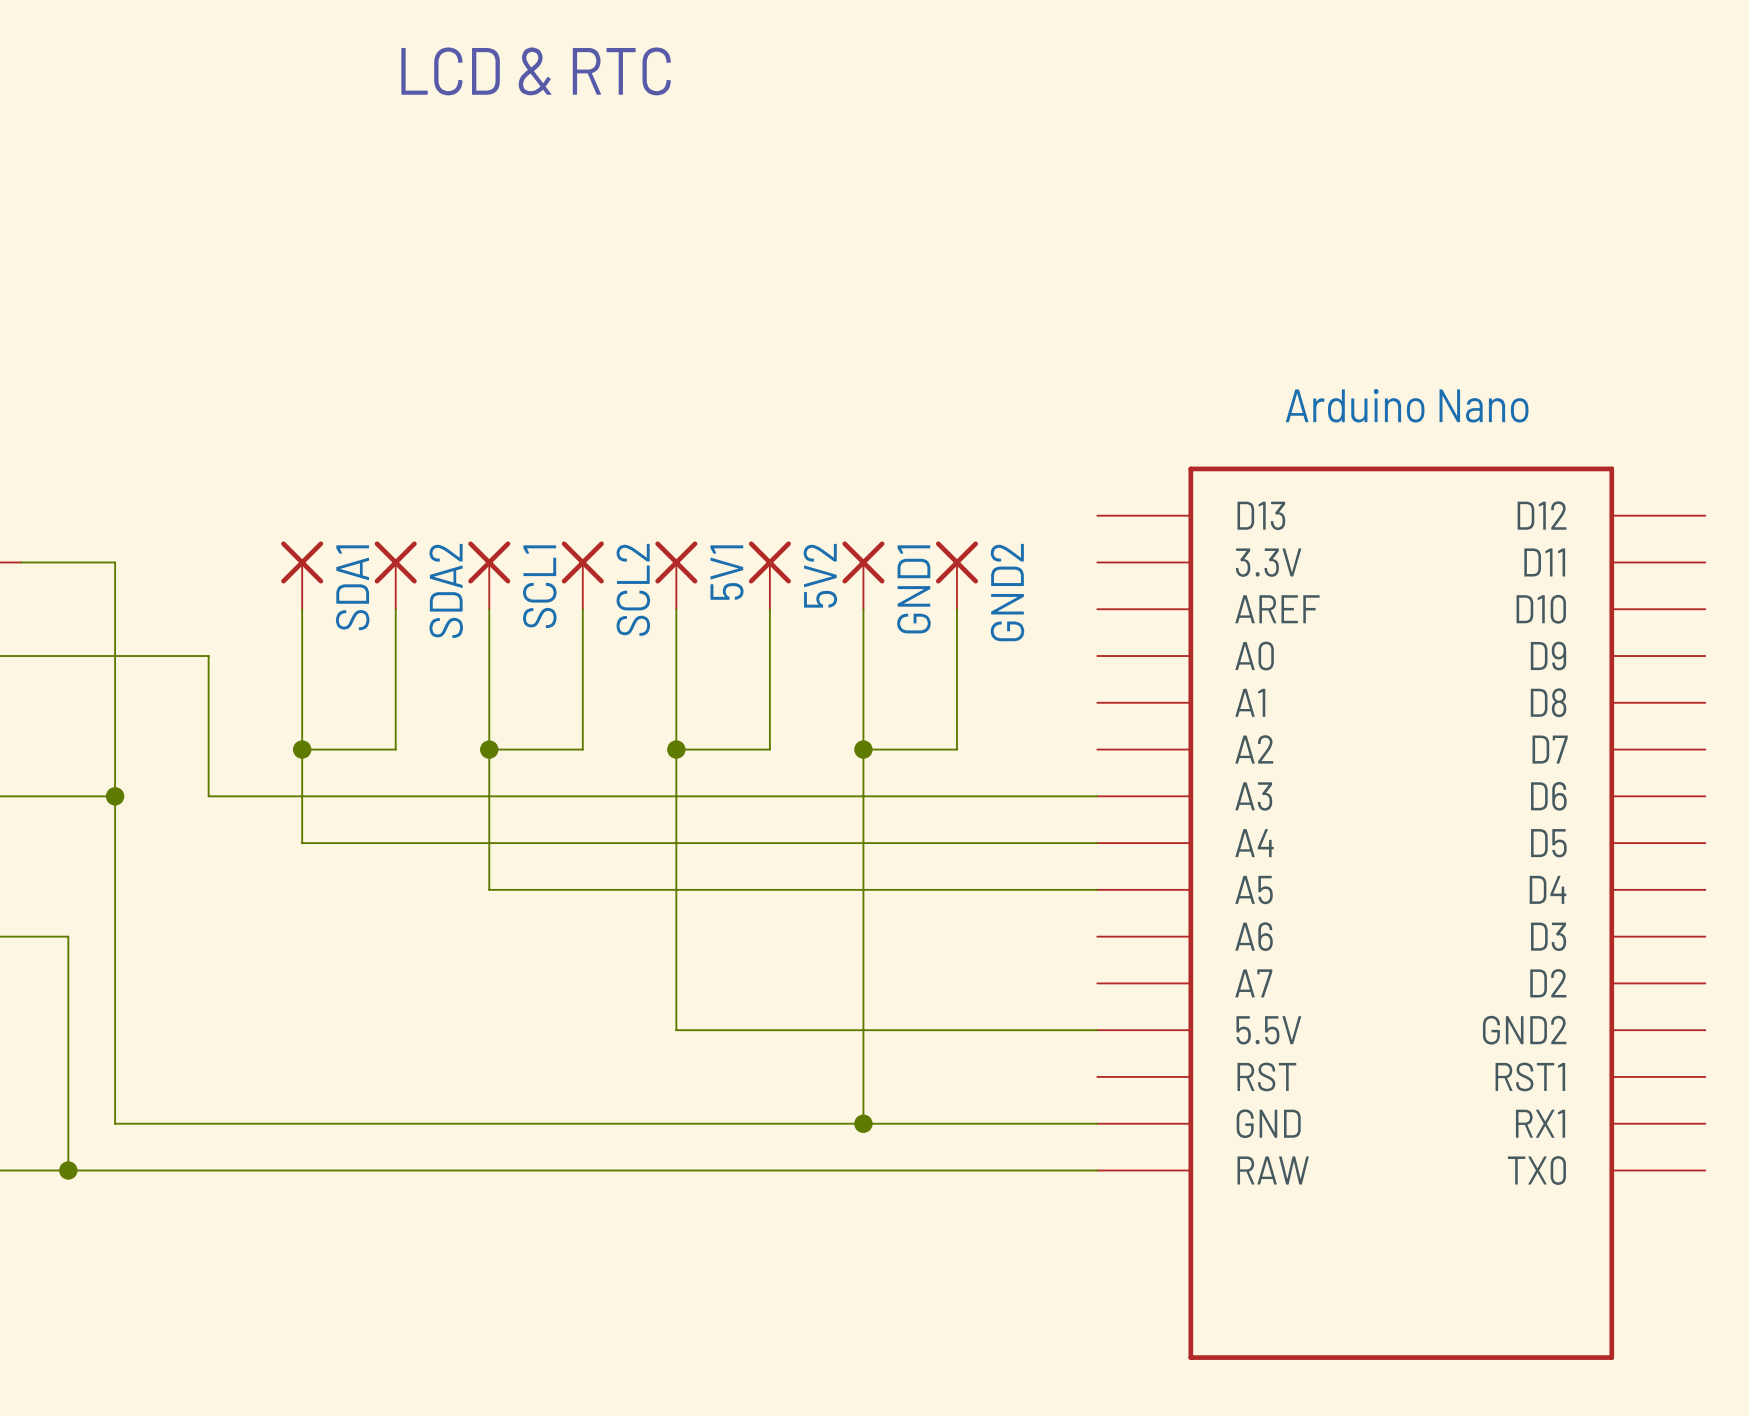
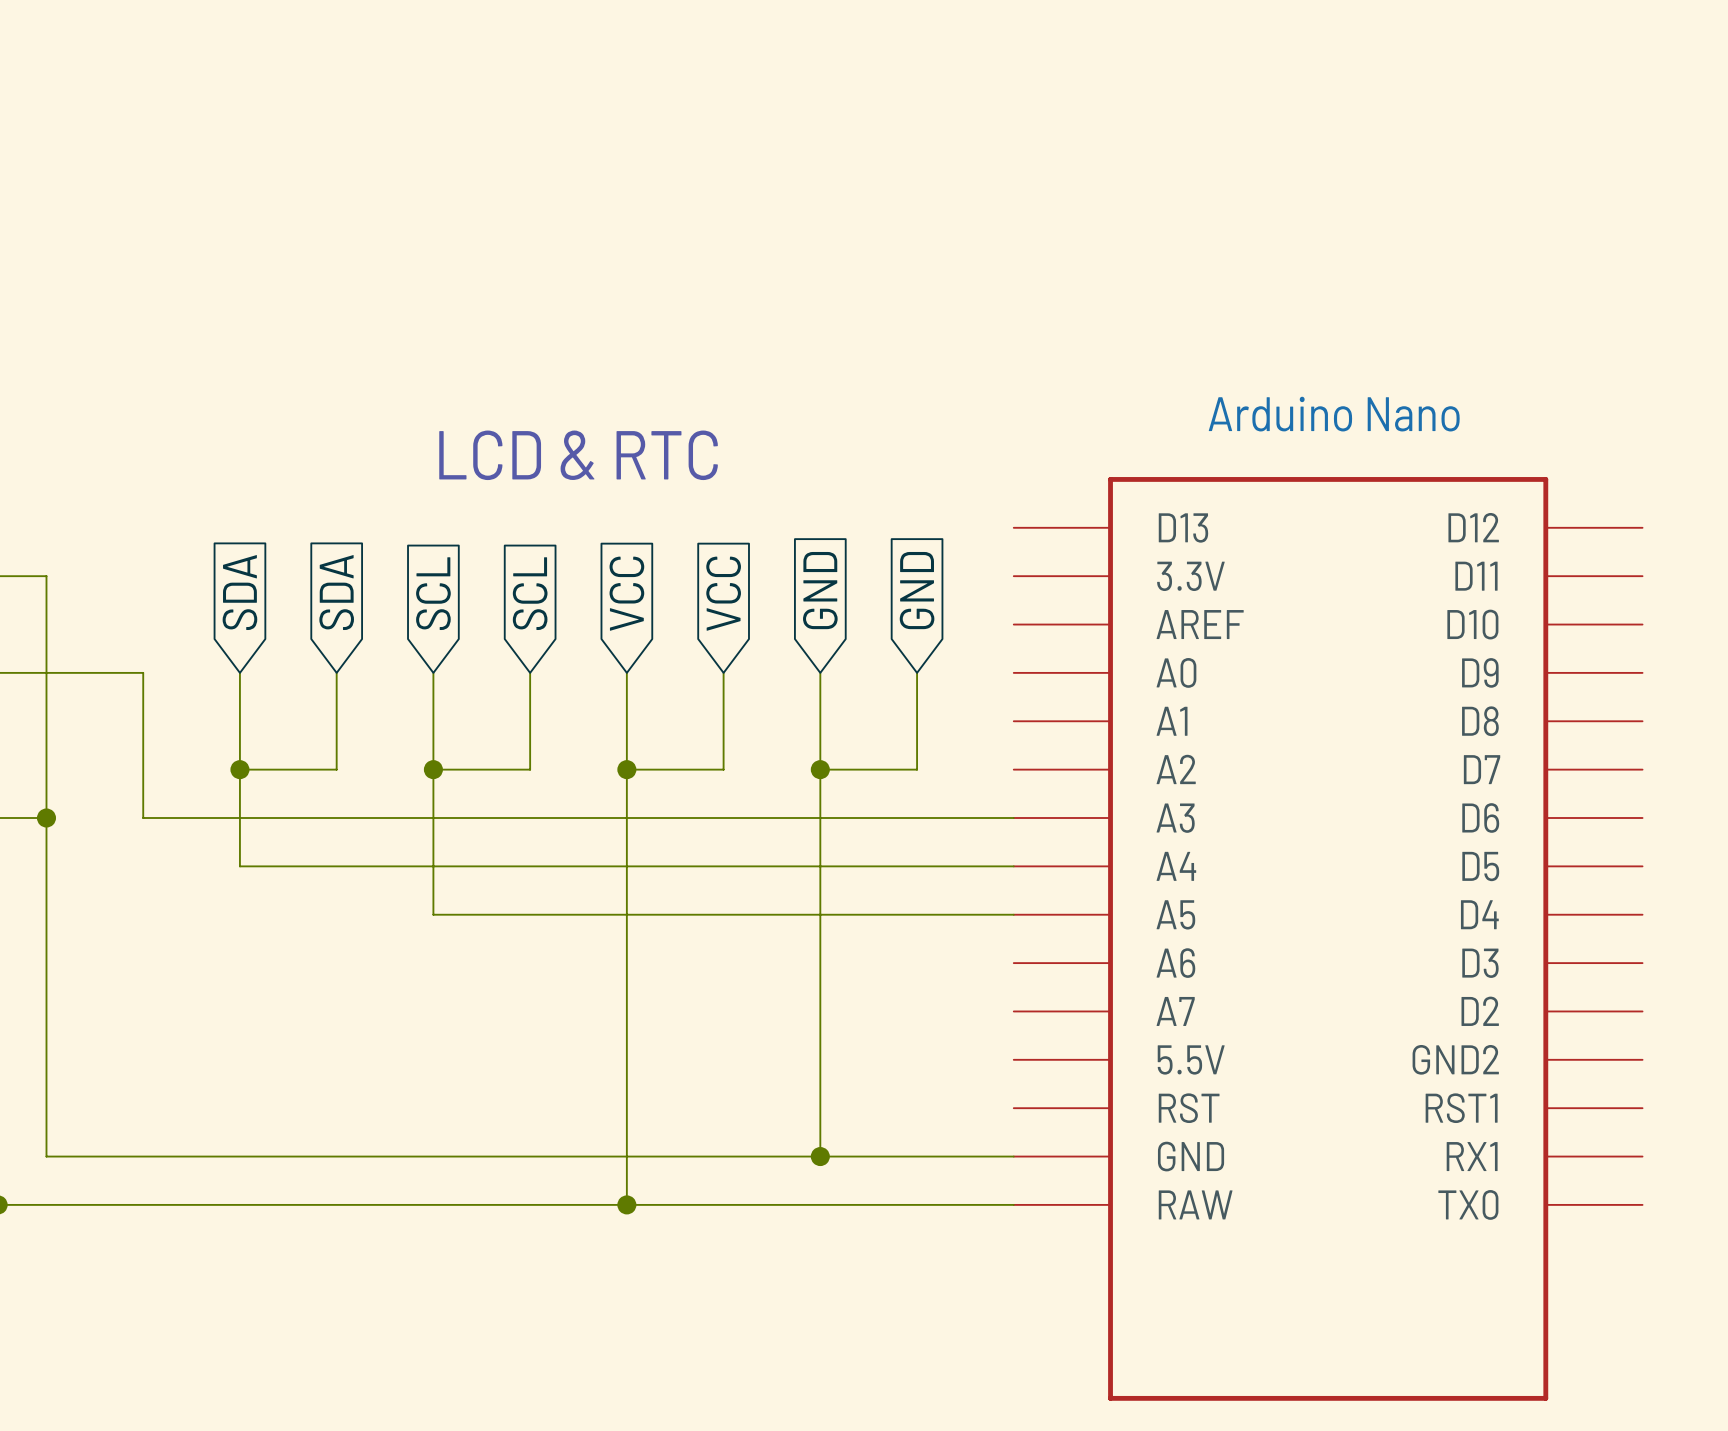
text position: LCD & RTC (536, 71) -> LCD & RTC (578, 455)
SDA1: (302, 575) -> none
SDA2: (395, 575) -> none
SCL1: (489, 575) -> none
SCL2: (582, 575) -> none
5V1: (676, 575) -> none
5V2: (769, 575) -> none
GND1: (863, 575) -> none
GND2: (956, 575) -> none
global label: none -> GND (820, 590)
global label: none -> GND (917, 590)
global label: none -> SDA (239, 592)
global label: none -> SDA (336, 592)
global label: none -> SCL (433, 593)
global label: none -> SCL (530, 593)
global label: none -> VCC (626, 593)
global label: none -> VCC (723, 593)
wire: (302, 609) (302, 656) -> none
wire: (395, 609) (395, 656) -> none
wire: (489, 609) (489, 656) -> none
wire: (582, 609) (582, 656) -> none
wire: (676, 609) (676, 656) -> none
wire: (769, 609) (769, 656) -> none
wire: (863, 609) (863, 656) -> none
wire: (956, 609) (956, 656) -> none
part position: (1401, 913) -> (1328, 938)
wire: (676, 1030) (1097, 1030) -> (626, 1059) (626, 1204)
junction: none -> (626, 1204)

